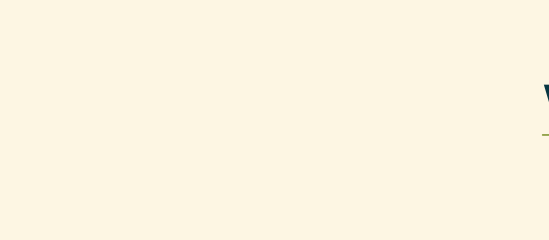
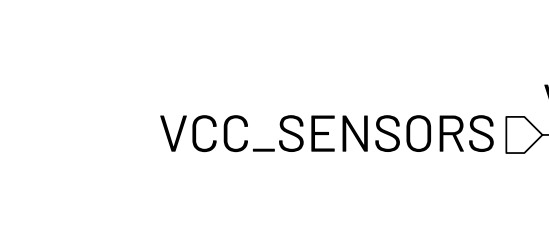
hierarchical label: none -> VCC_SENSORS (326, 133)

